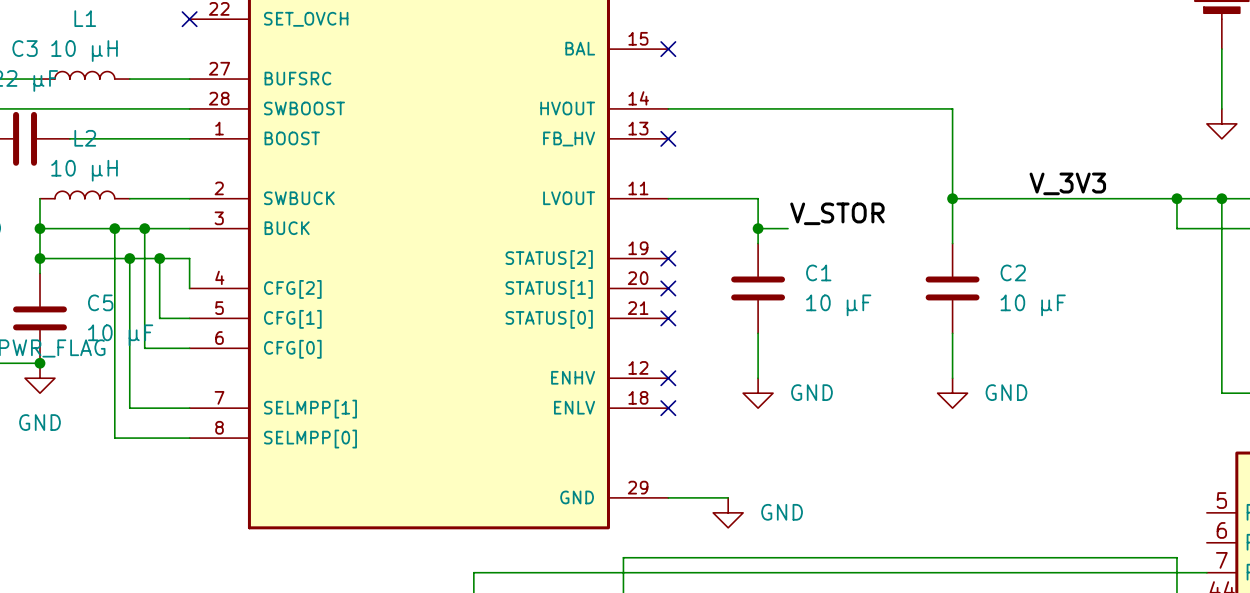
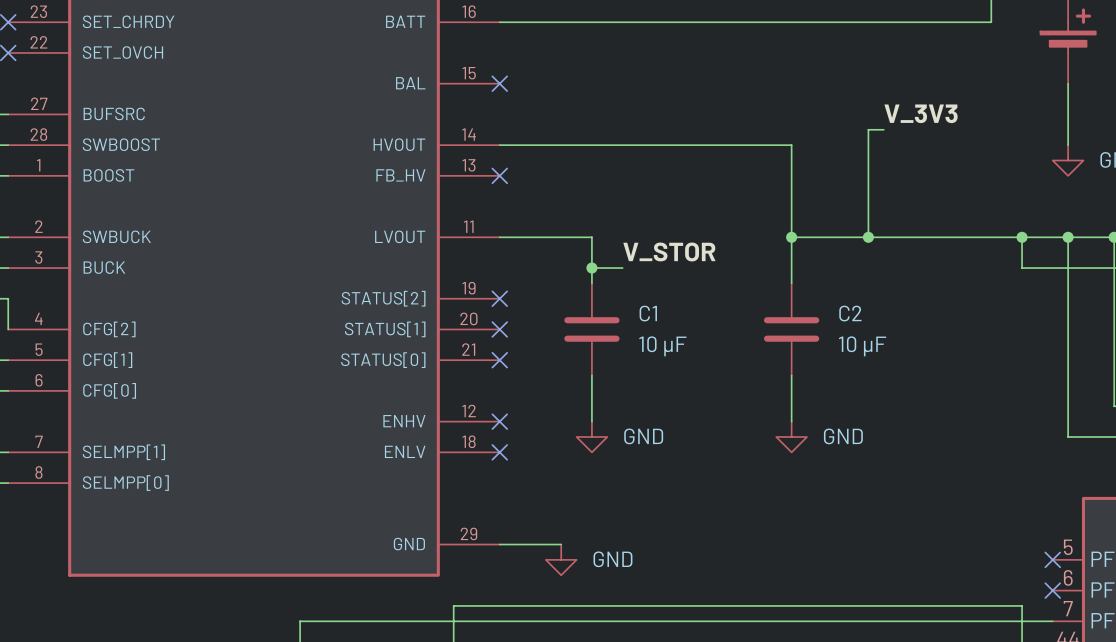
wire: none -> (883, 129) (868, 129) (868, 237)
label position: V_3V3 (1067, 183) -> V_3V3 (921, 113)
junction: none -> (868, 237)
no-connect mark: none -> (1052, 559)
no-connect mark: none -> (1052, 590)

